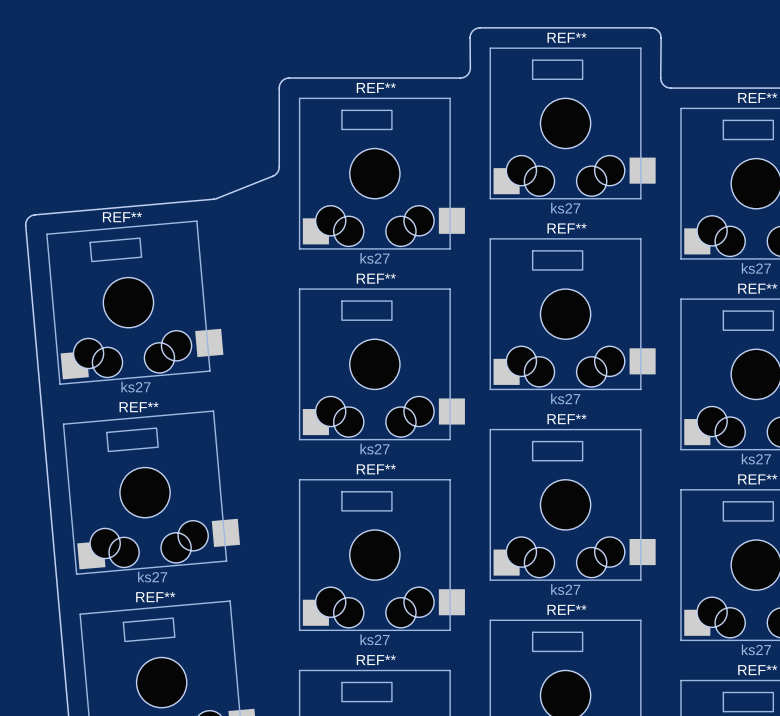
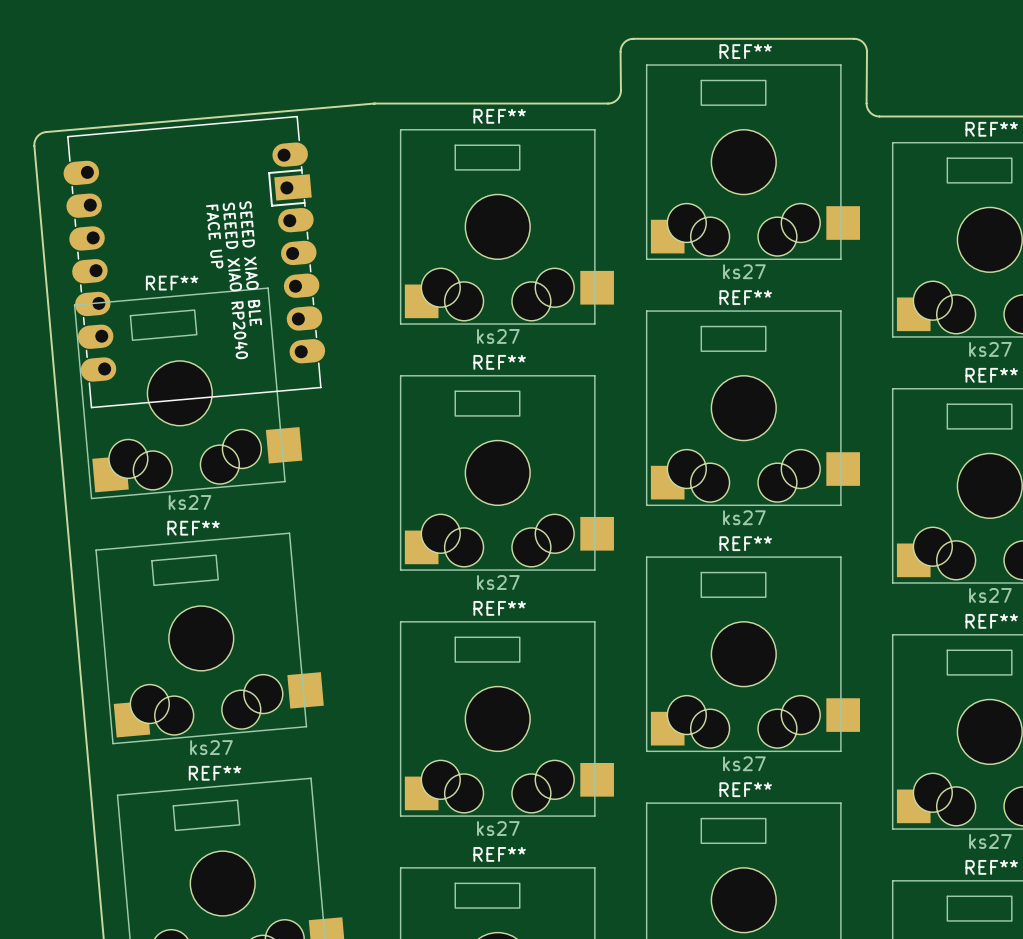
board edge: (289, 78) (283, 80) (279, 86) (279, 168) (274, 175) (215, 198) (34, 214) (28, 218) (25, 225) -> (387, 103) (40, 133) (35, 139) (34, 146) (47, 294)
part: none -> (194, 262)

